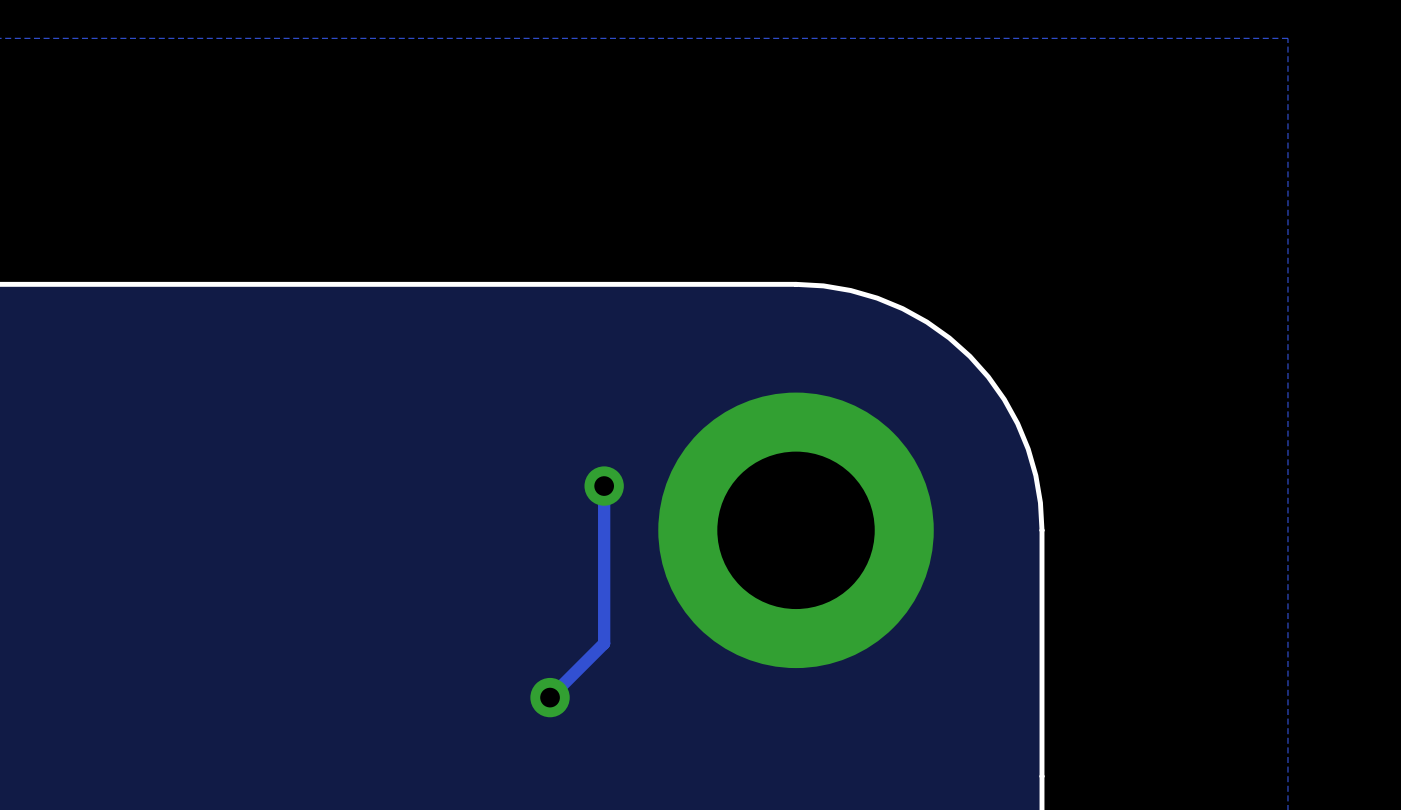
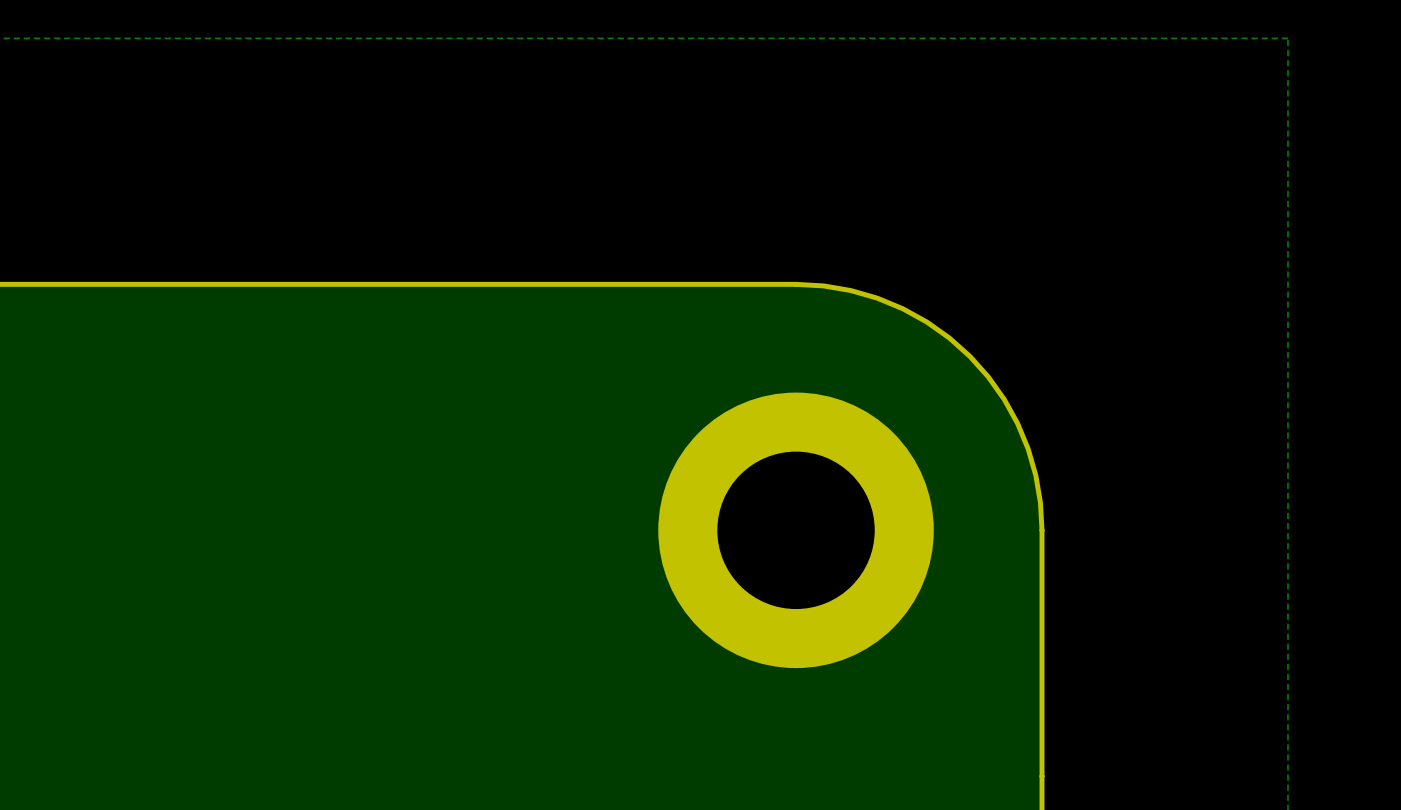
track: (604, 486) (604, 643) (550, 697) -> none
via: (604, 486) -> none
via: (550, 697) -> none

